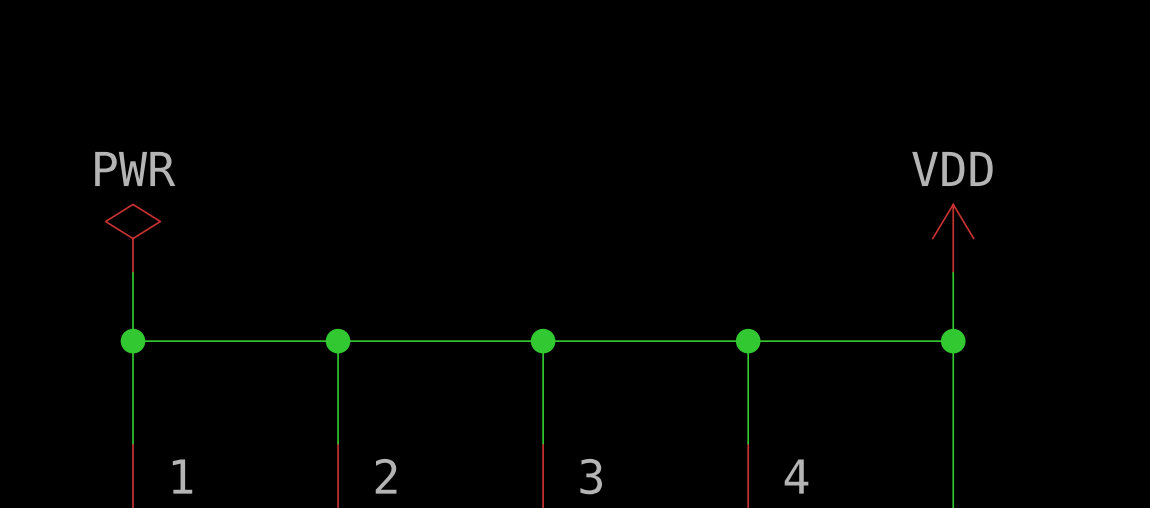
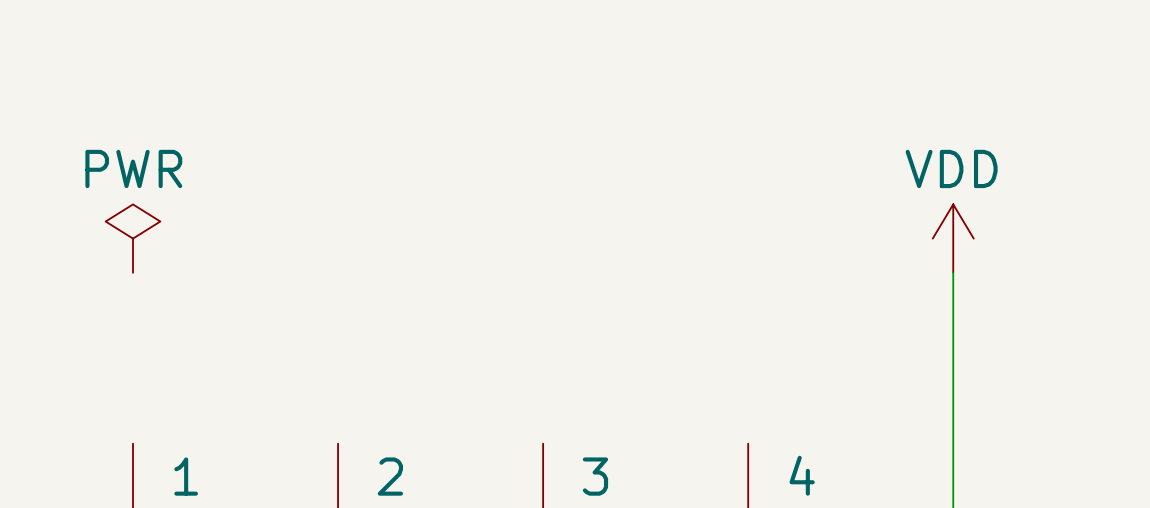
wire: (133, 272) (133, 443) -> none
wire: (133, 341) (953, 341) -> none
junction: (133, 341) -> none
wire: (338, 341) (338, 443) -> none
junction: (338, 341) -> none
wire: (543, 341) (543, 443) -> none
junction: (543, 341) -> none
wire: (748, 341) (748, 443) -> none
junction: (748, 341) -> none
junction: (953, 341) -> none

